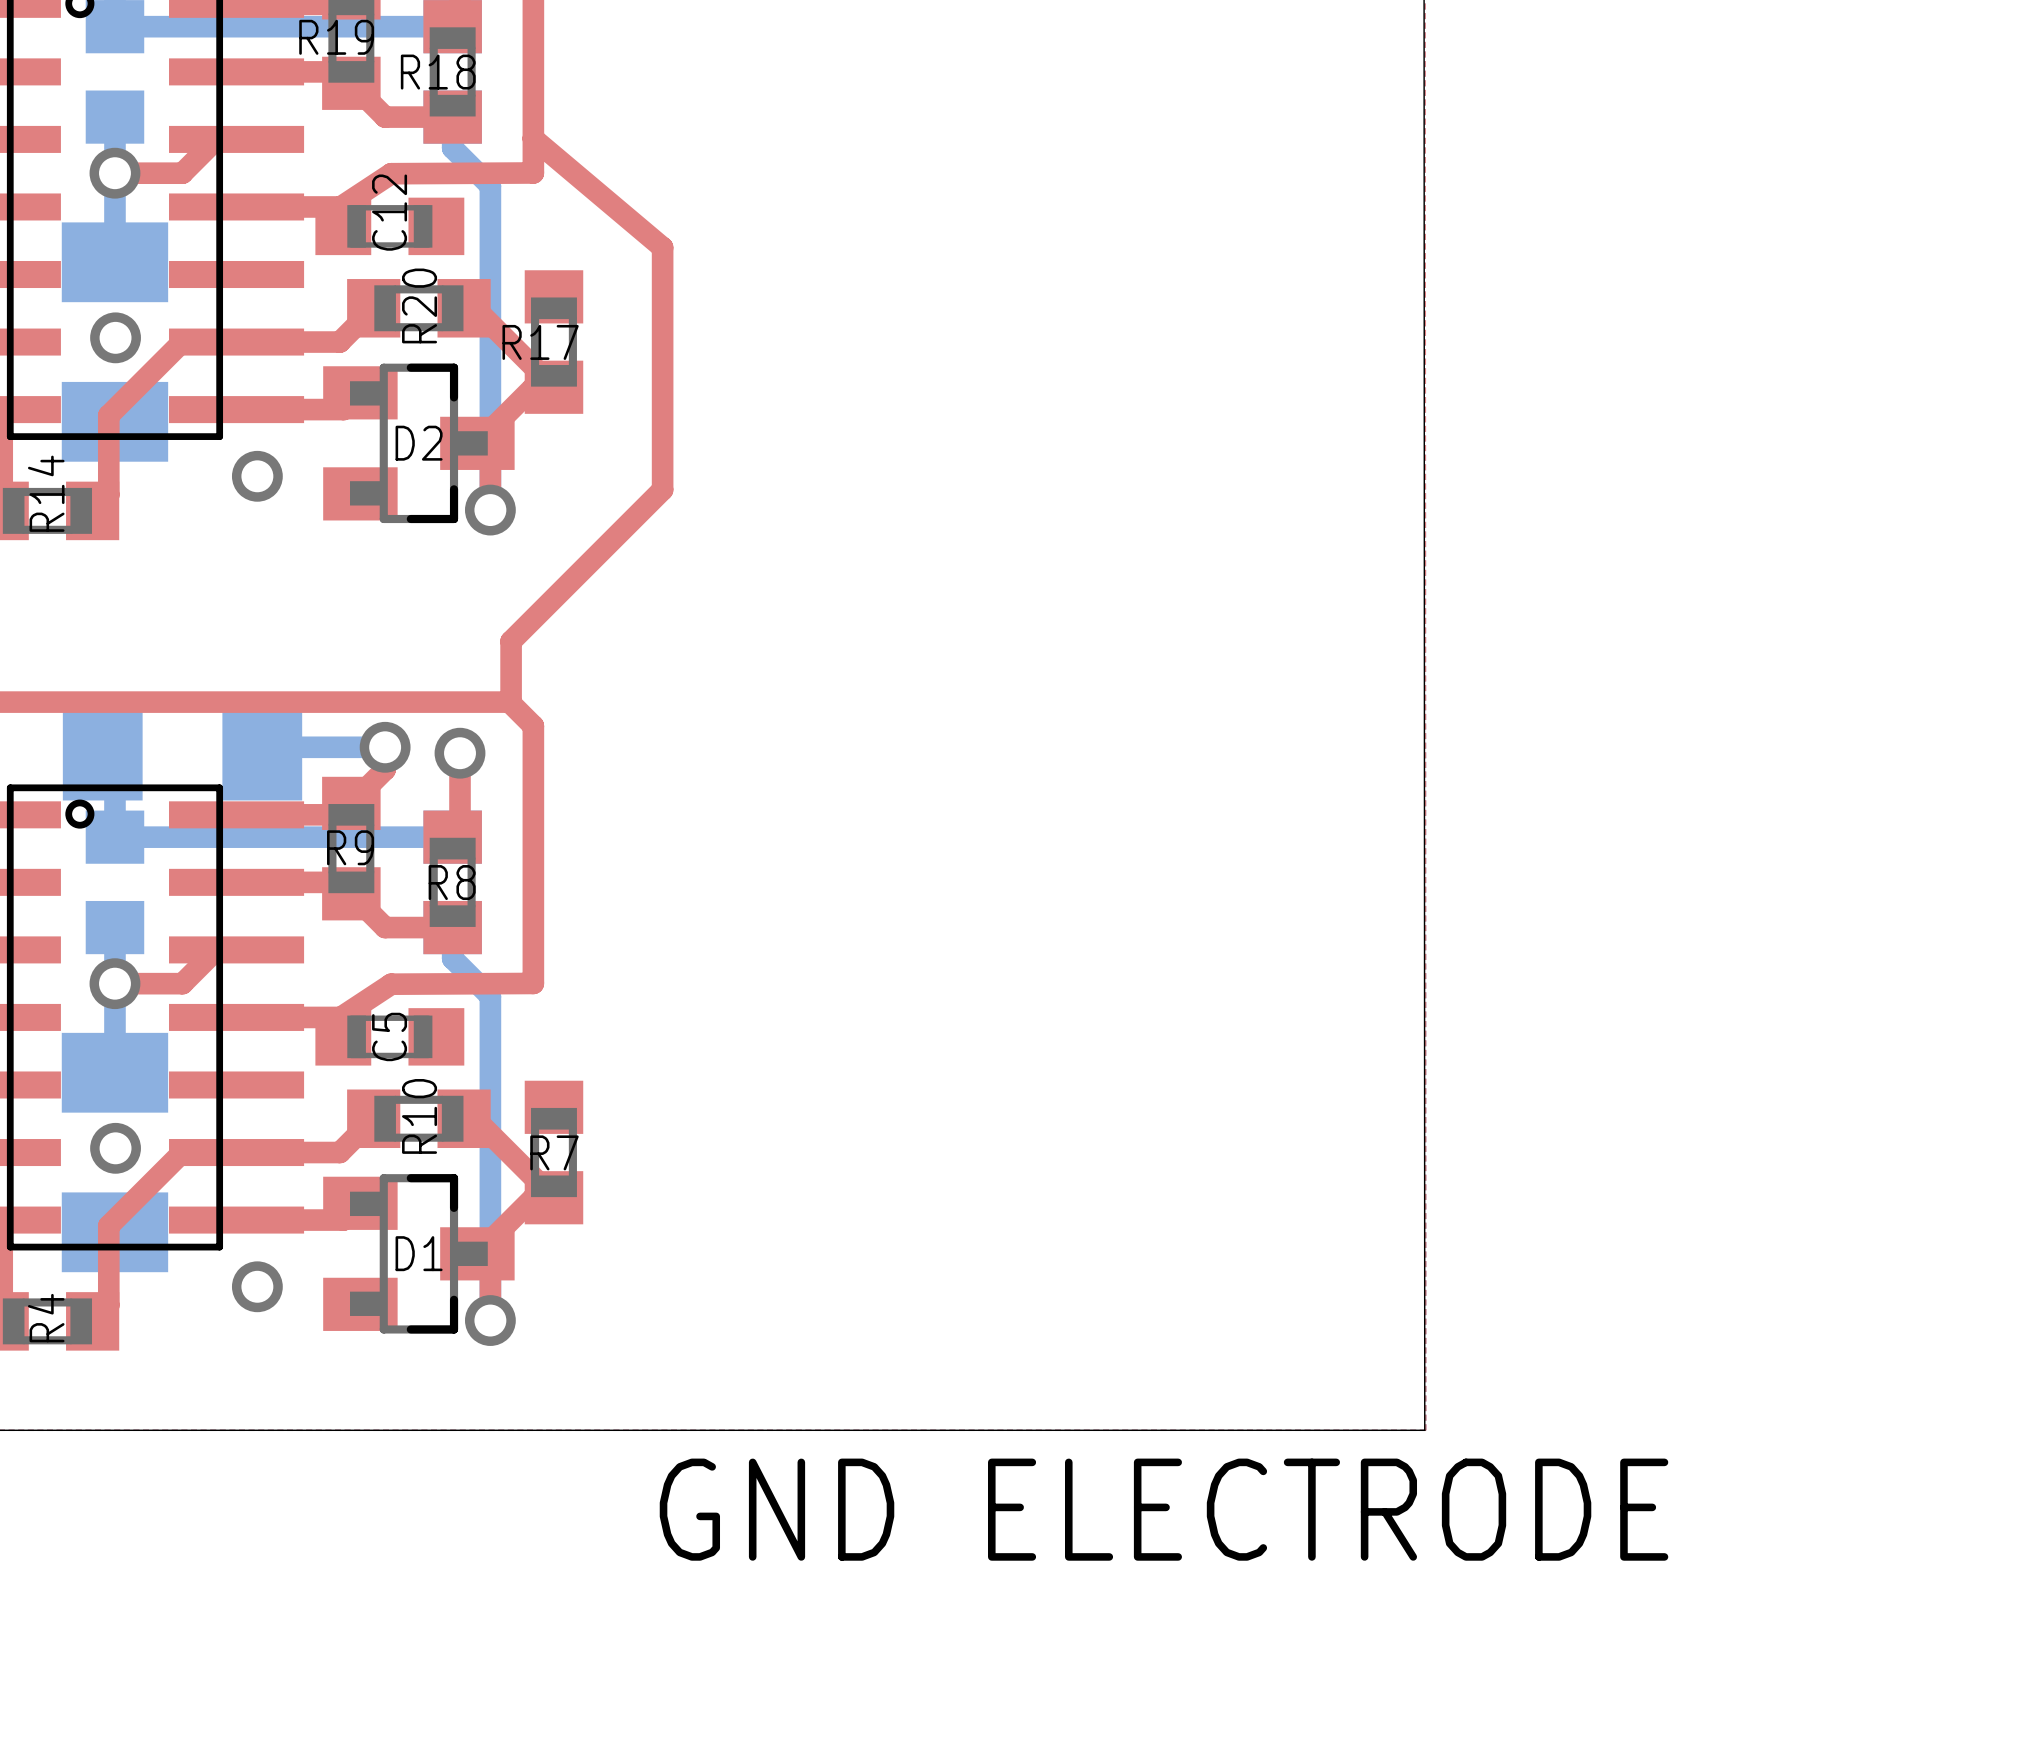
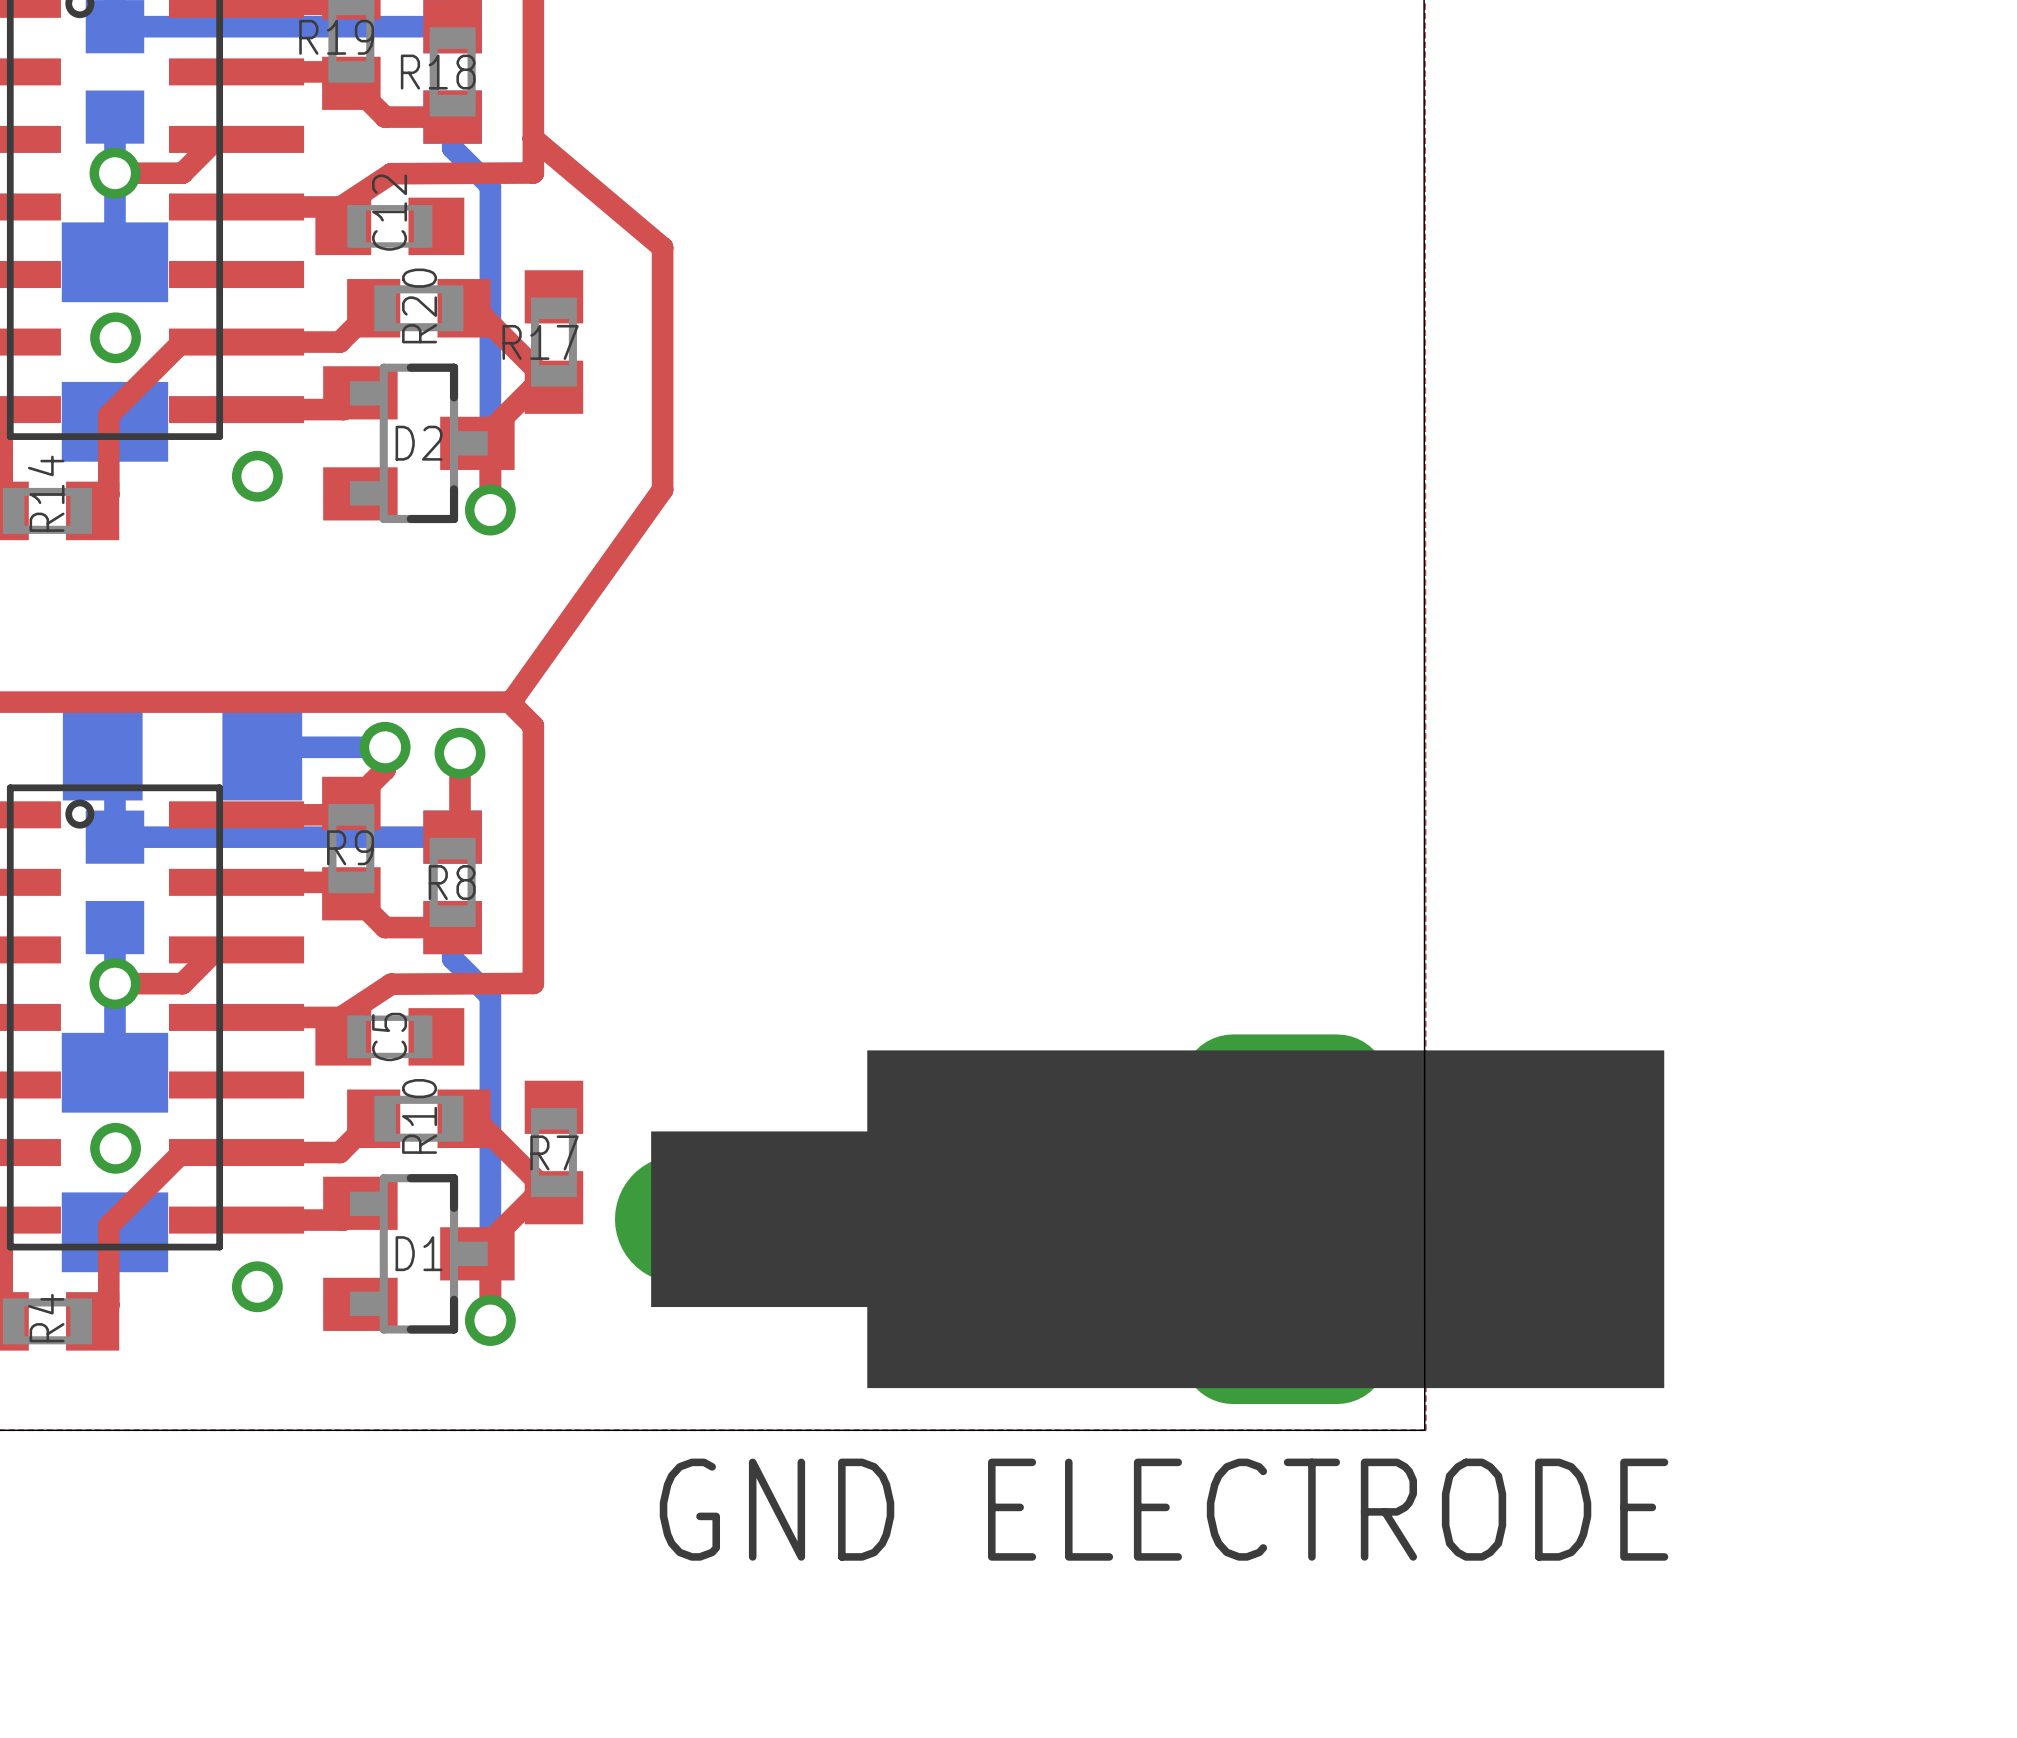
top track: (662, 489) (511, 641) (511, 702) -> (662, 489) (511, 702)
part: none -> (1139, 1219)

